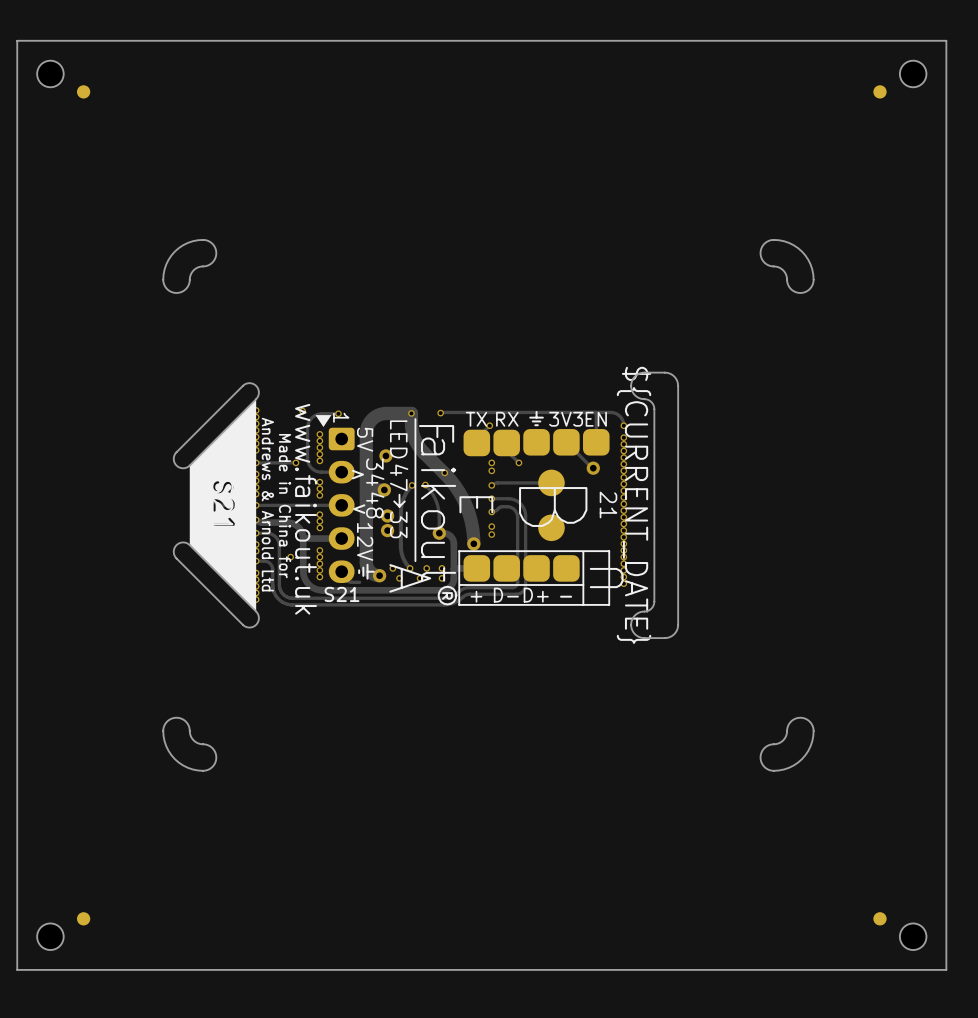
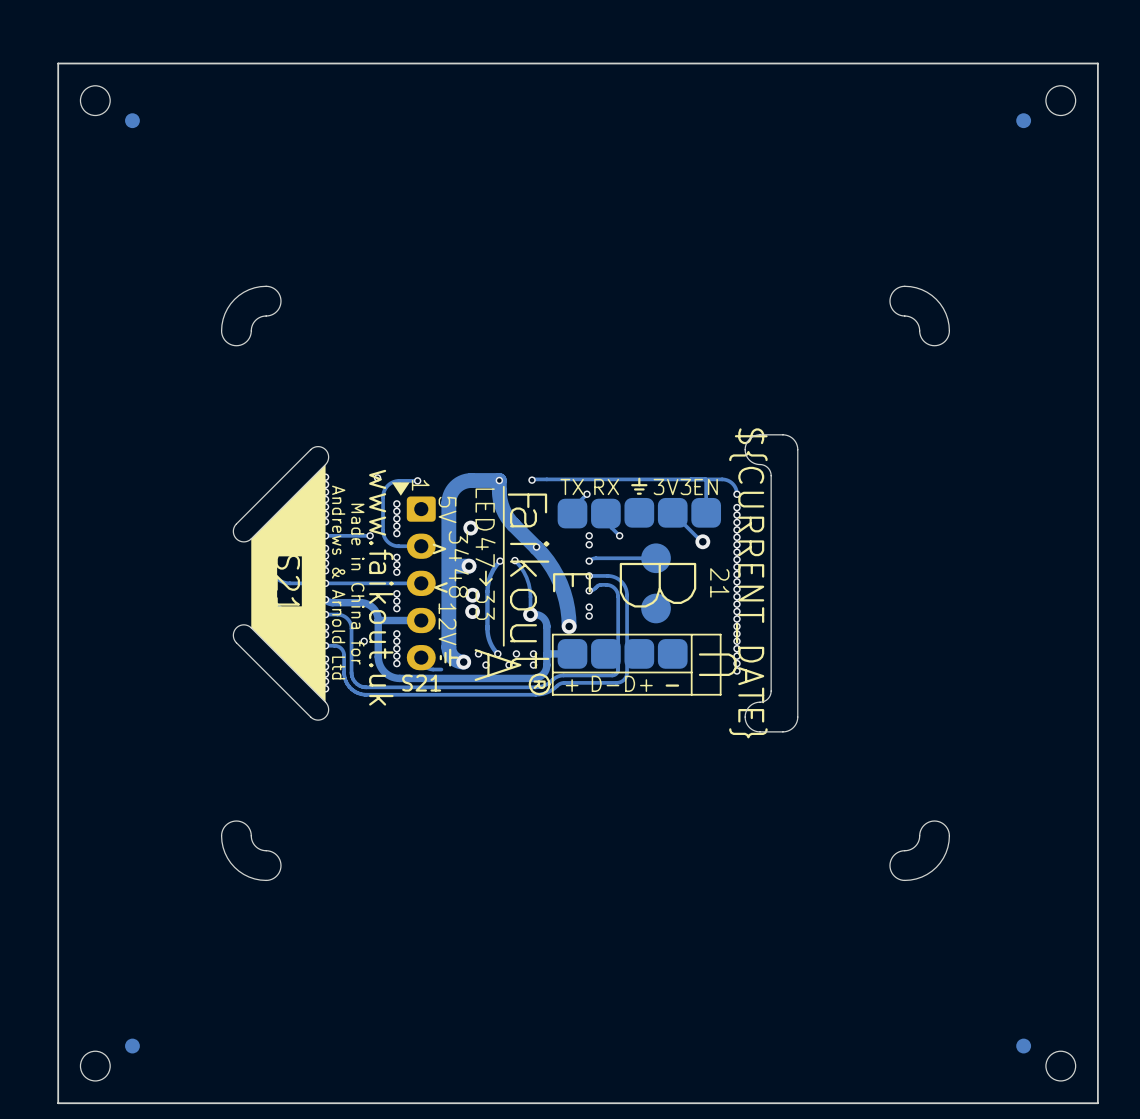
drawing shape: [189, 399, 257, 612] -> [251, 464, 326, 703]

